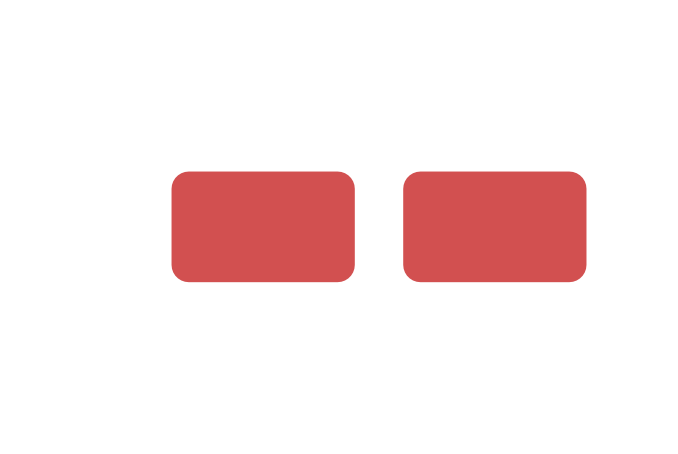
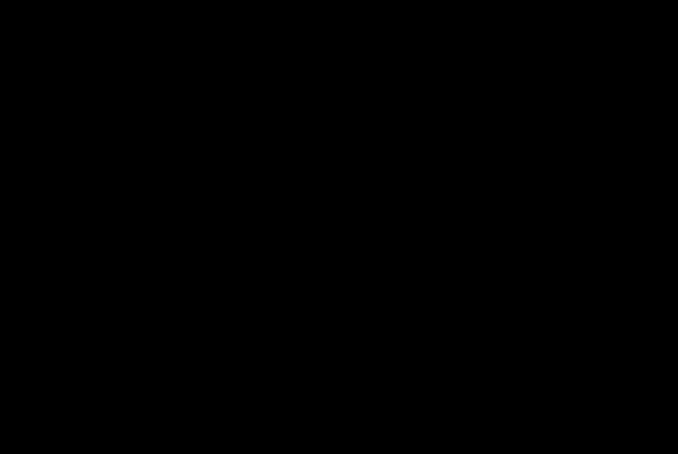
part: (379, 226) -> none

